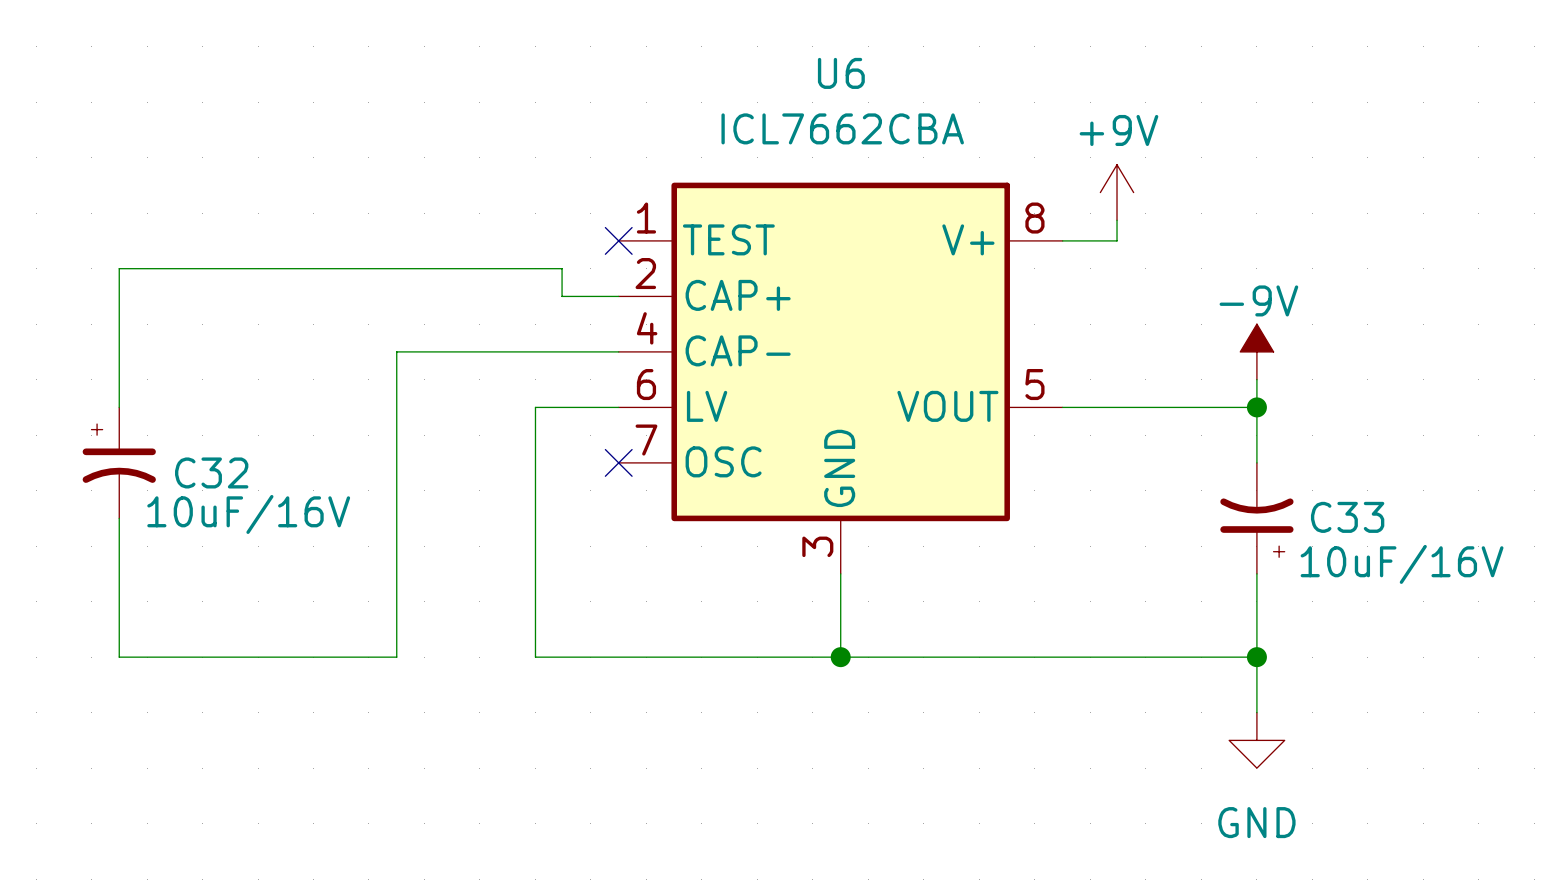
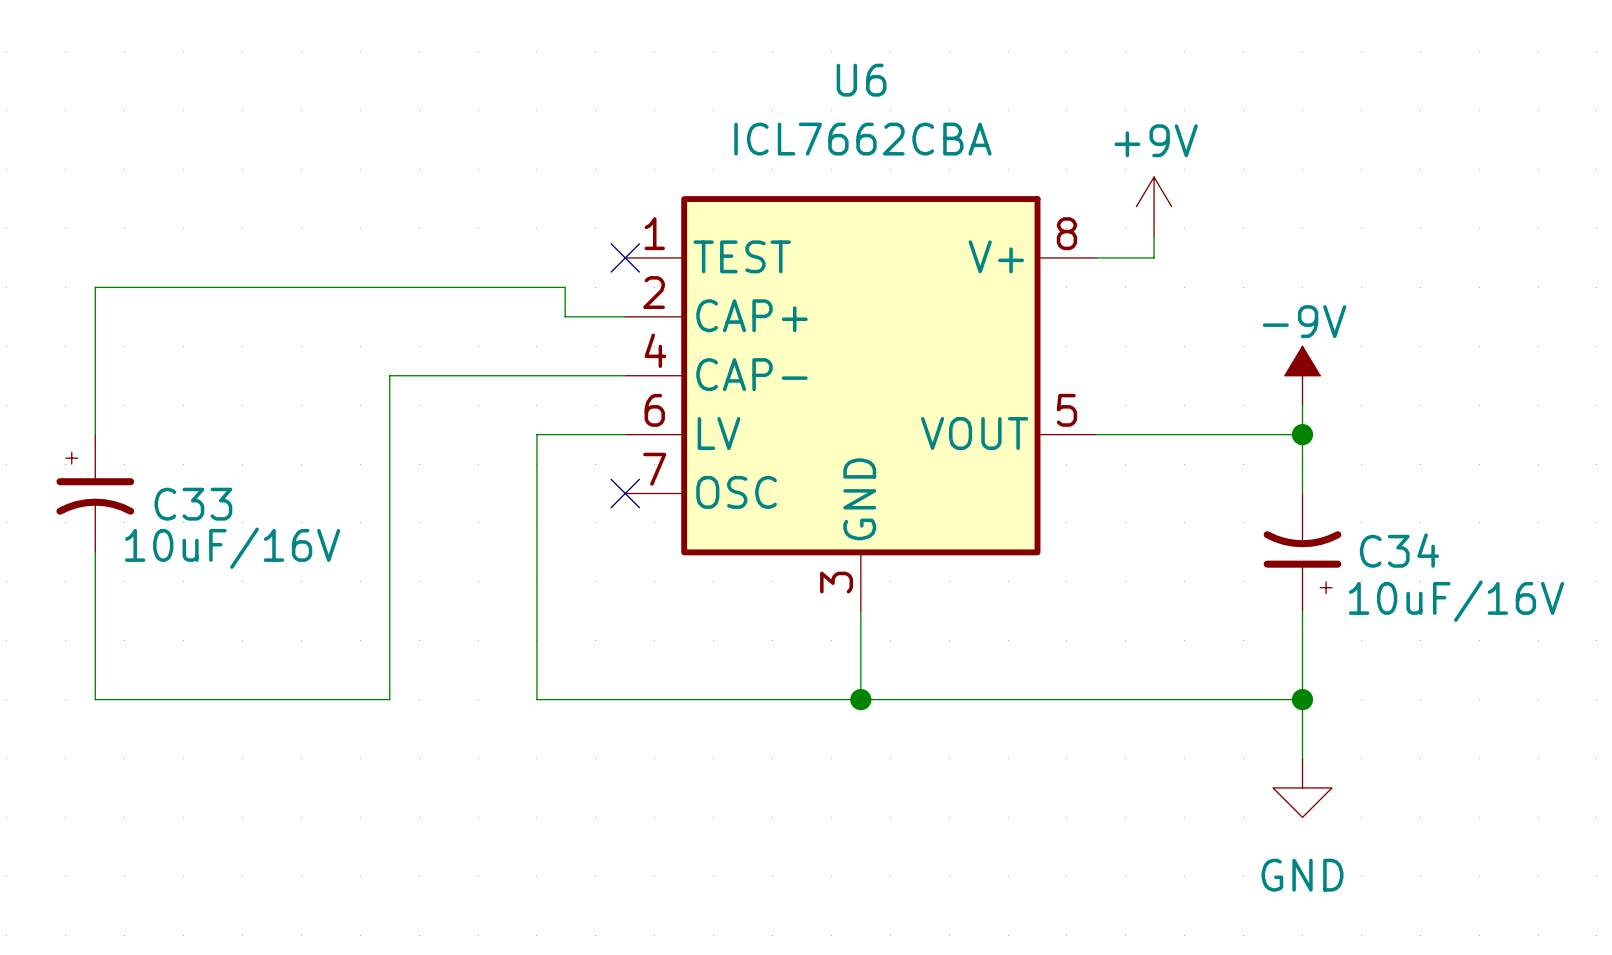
C32 name: C32 (211, 472) -> C33 (193, 504)
C33 name: C33 (1347, 517) -> C34 (1399, 550)

